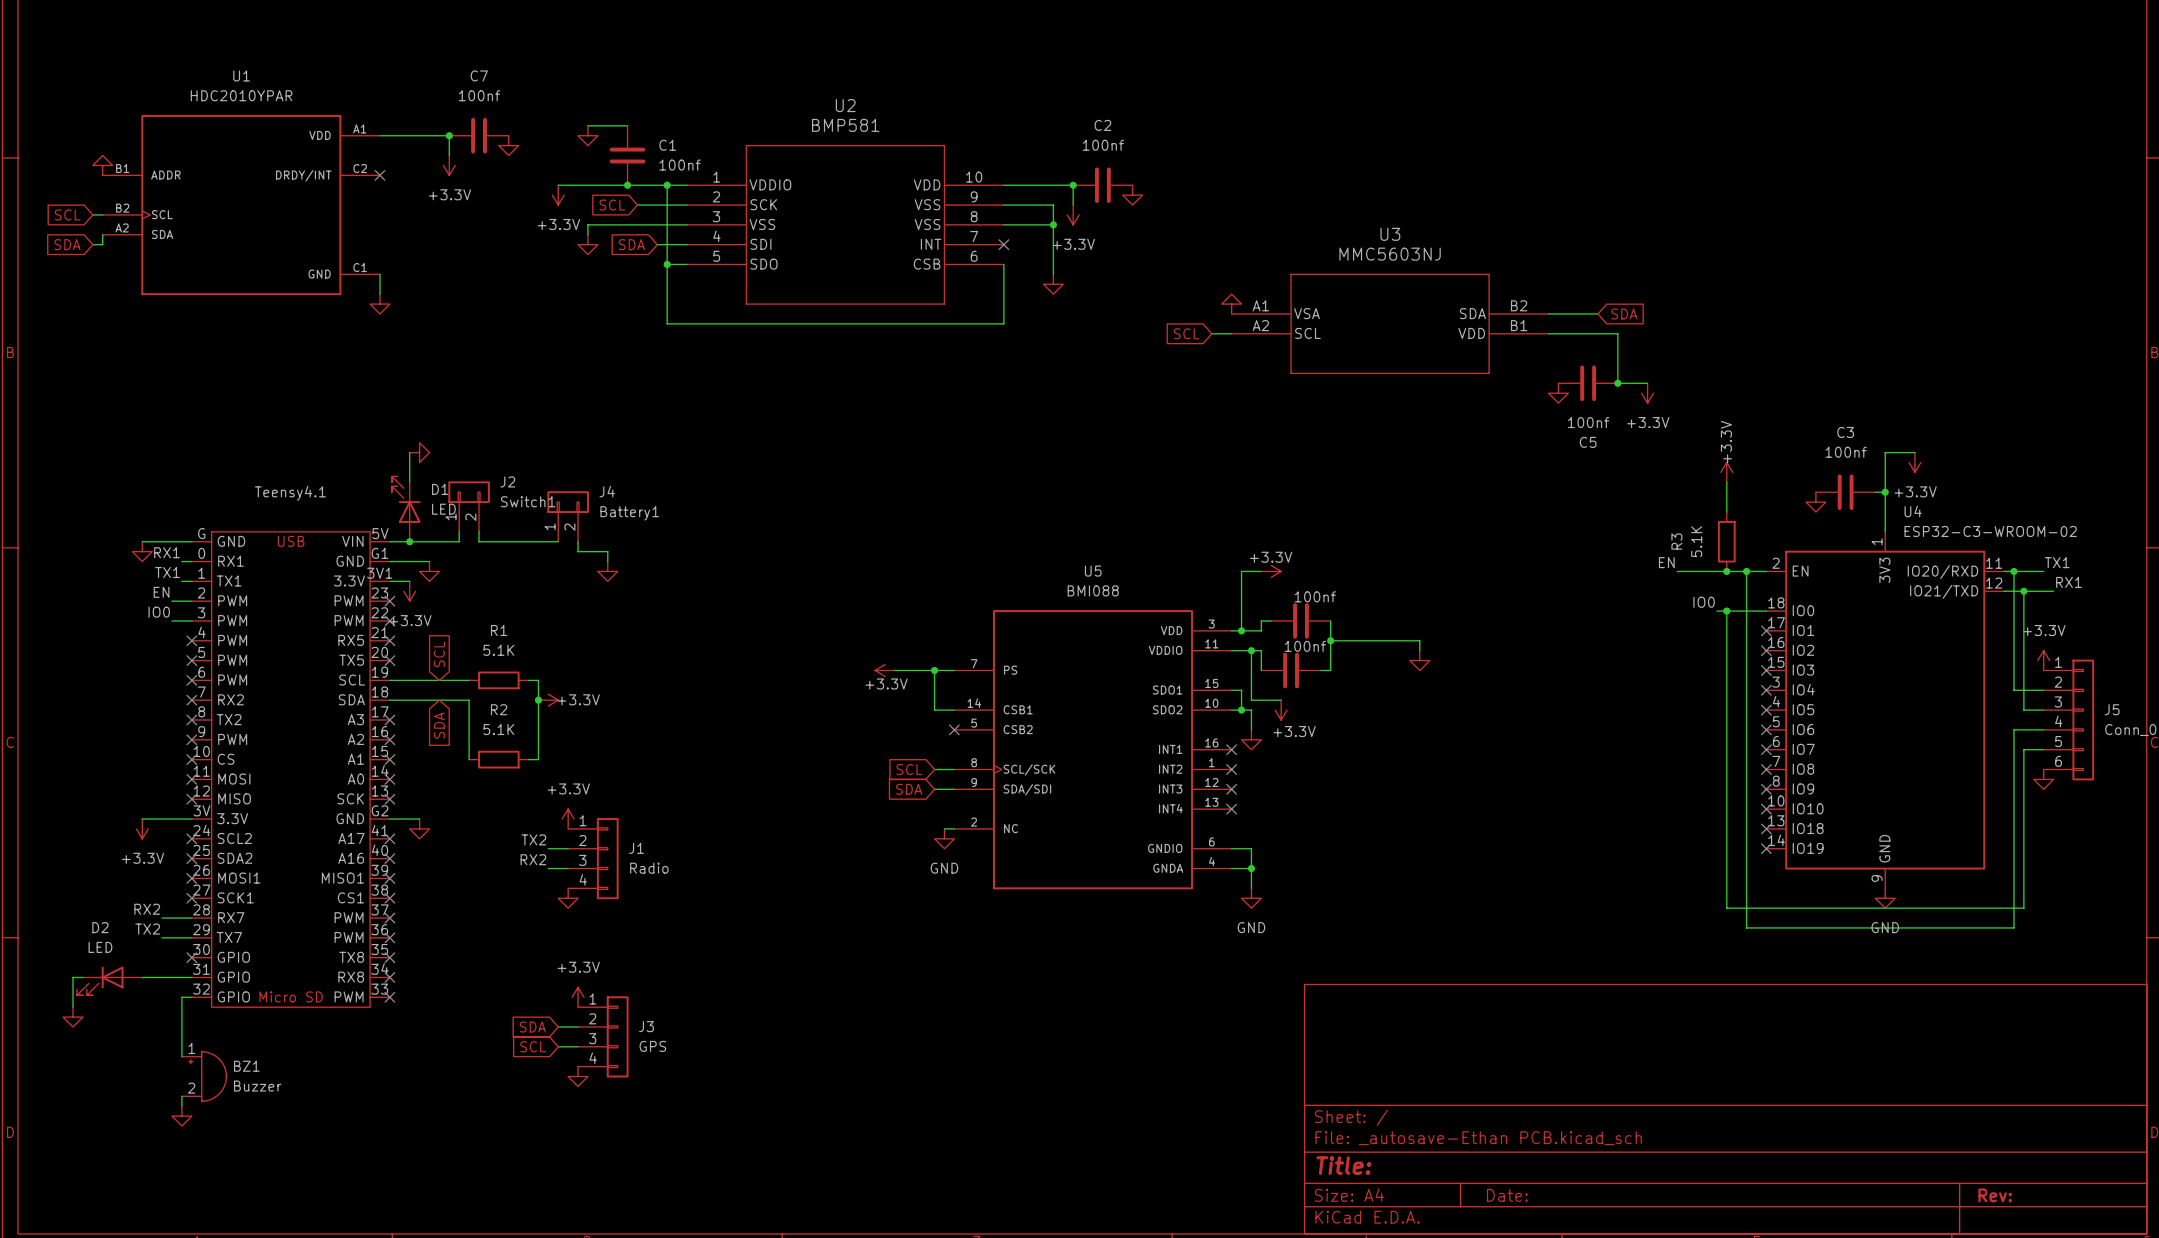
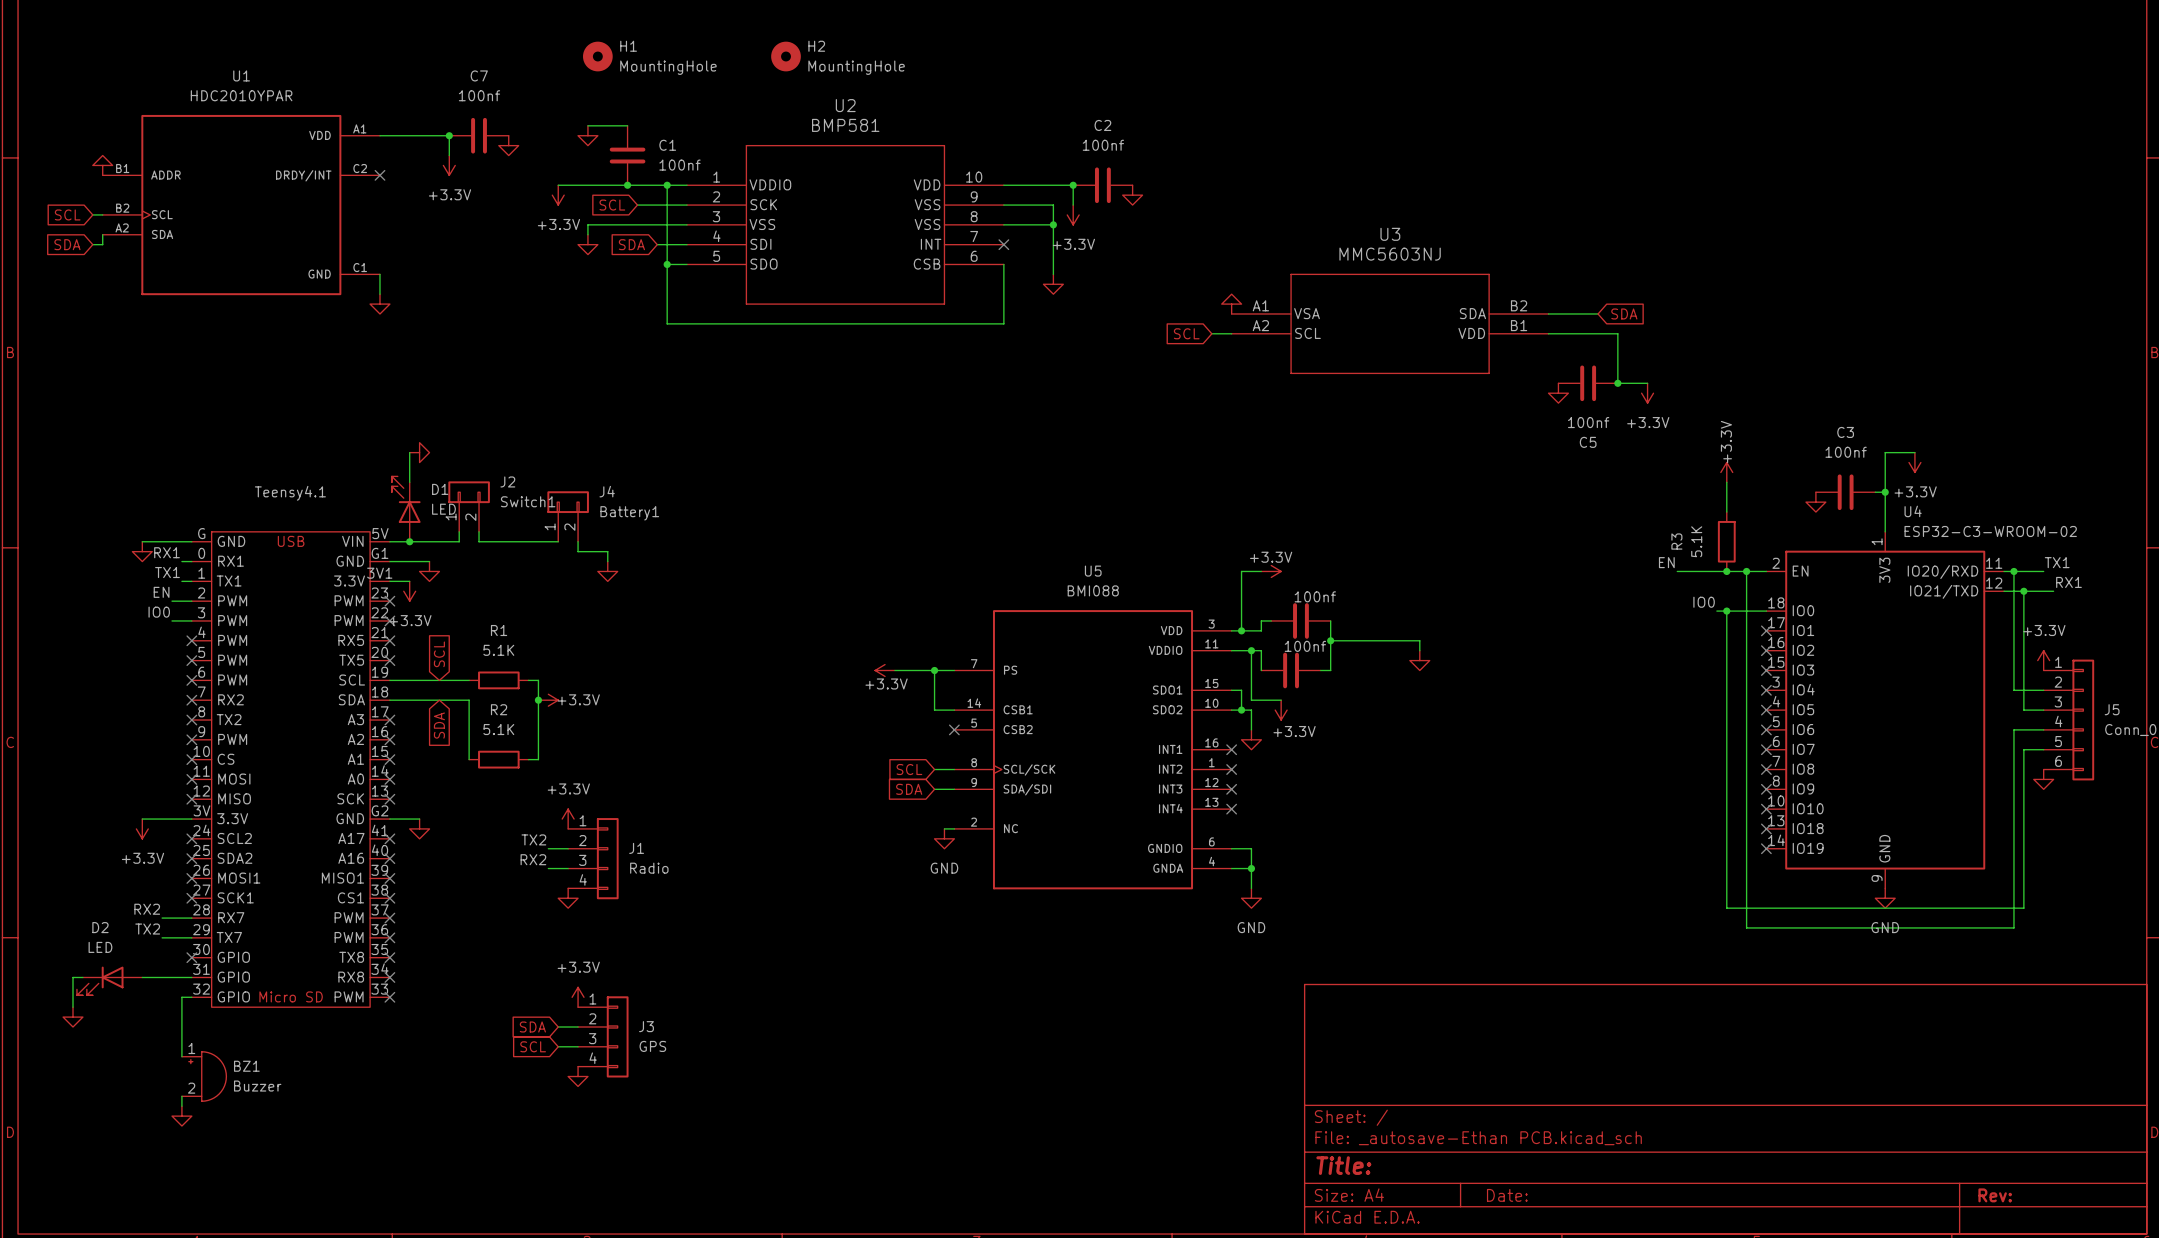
H1: none -> MountingHole (597, 56)
H2: none -> MountingHole (786, 56)

